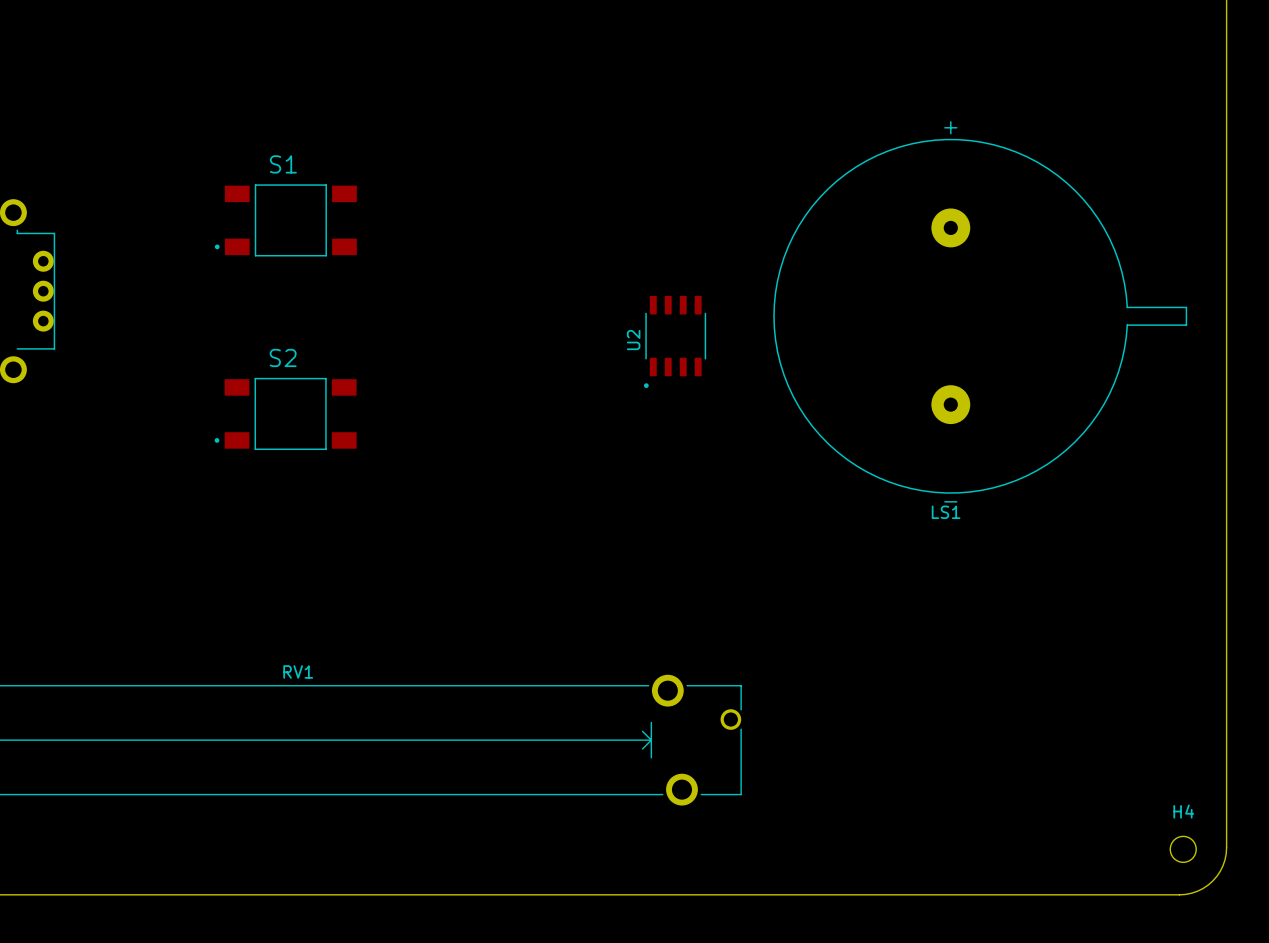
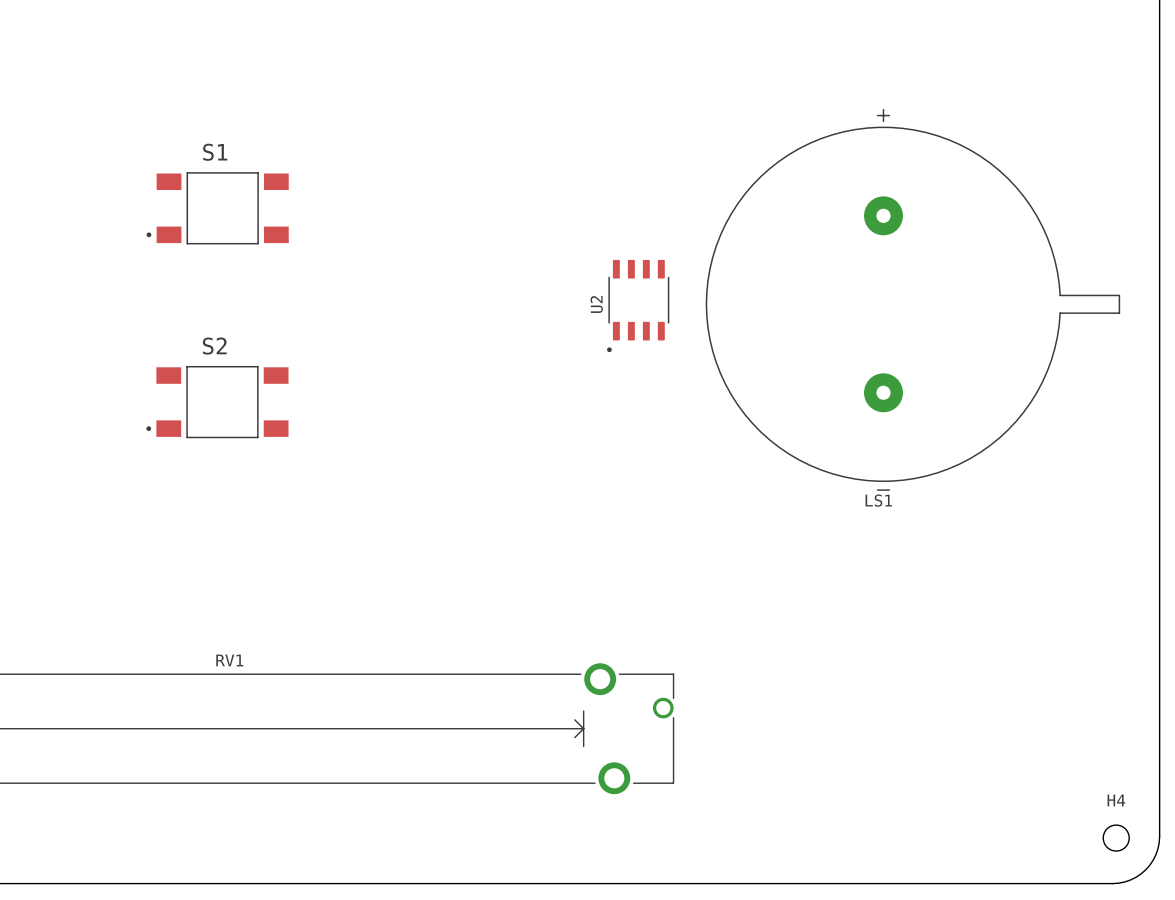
U2 position: (675, 341) -> (638, 306)

